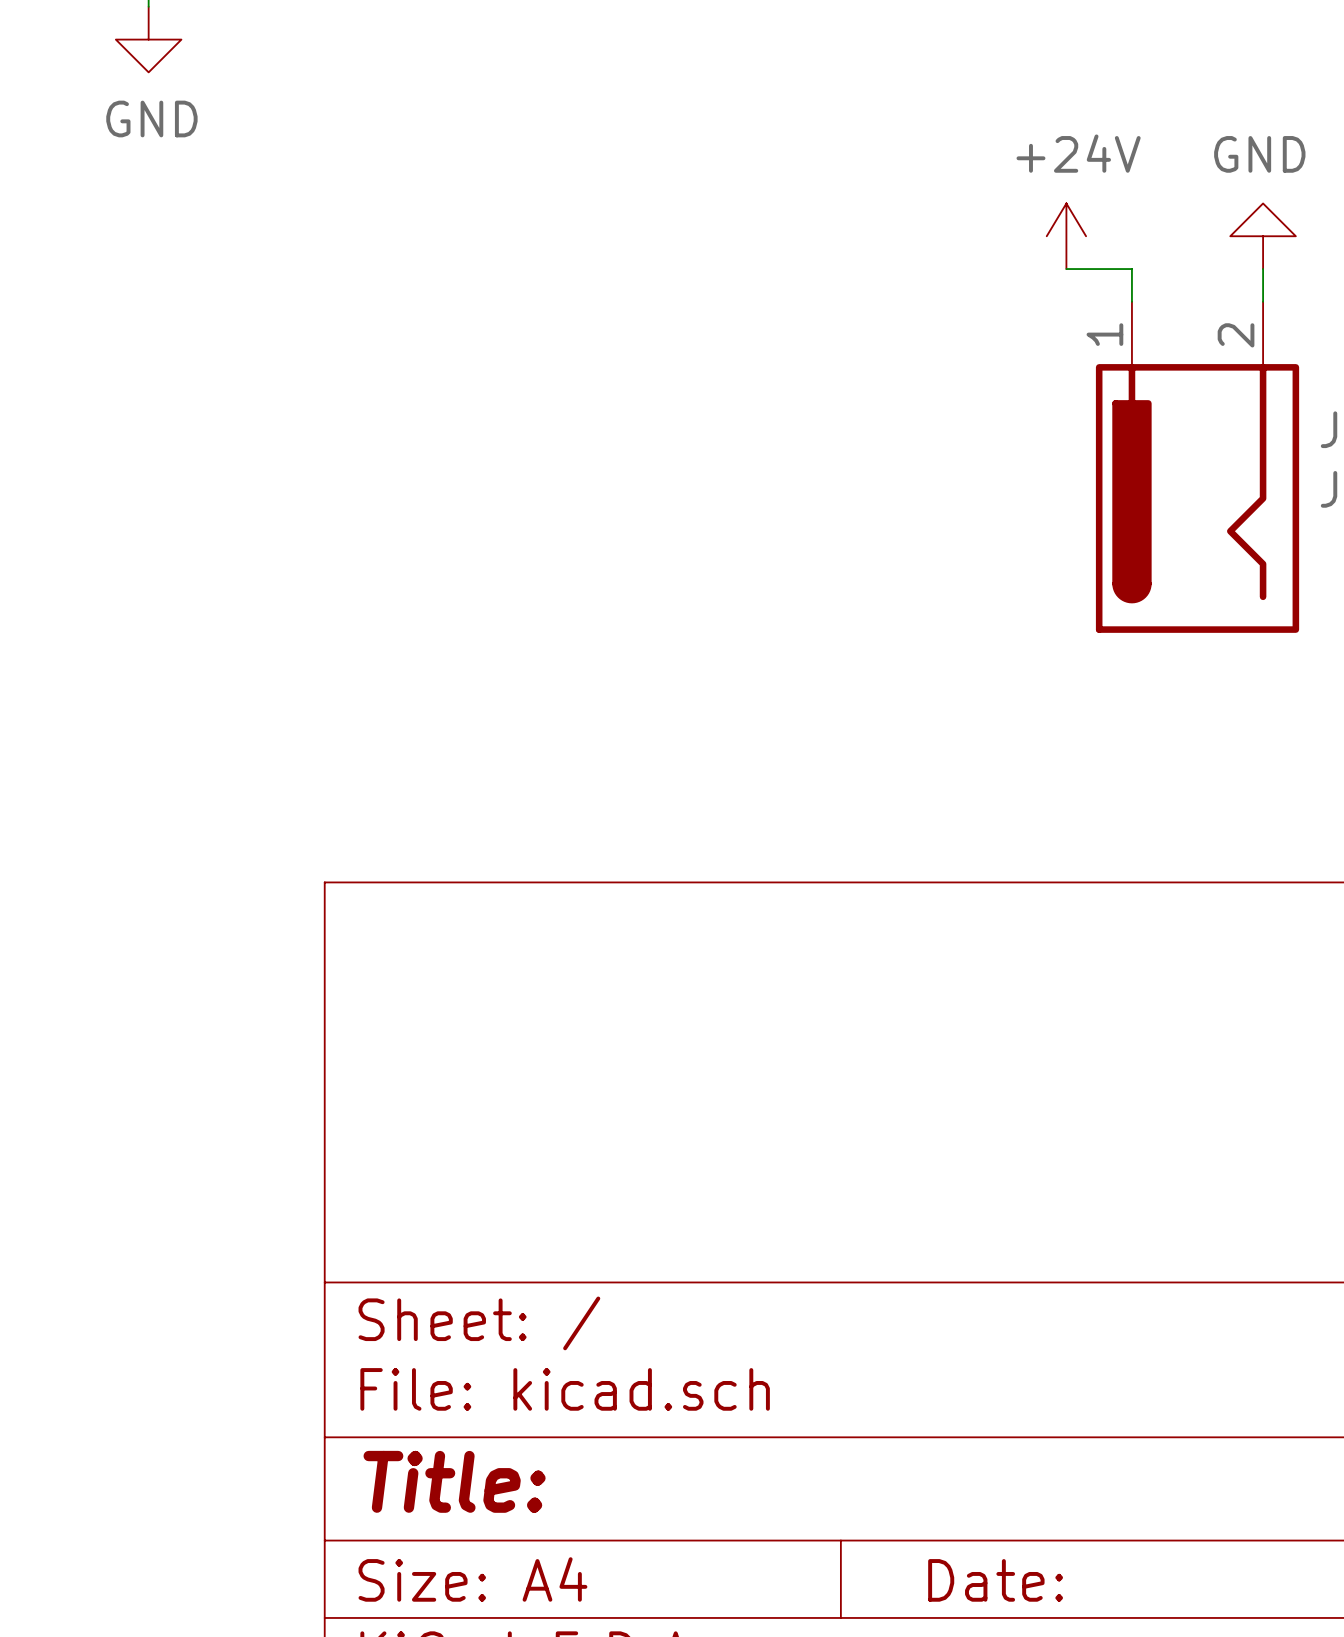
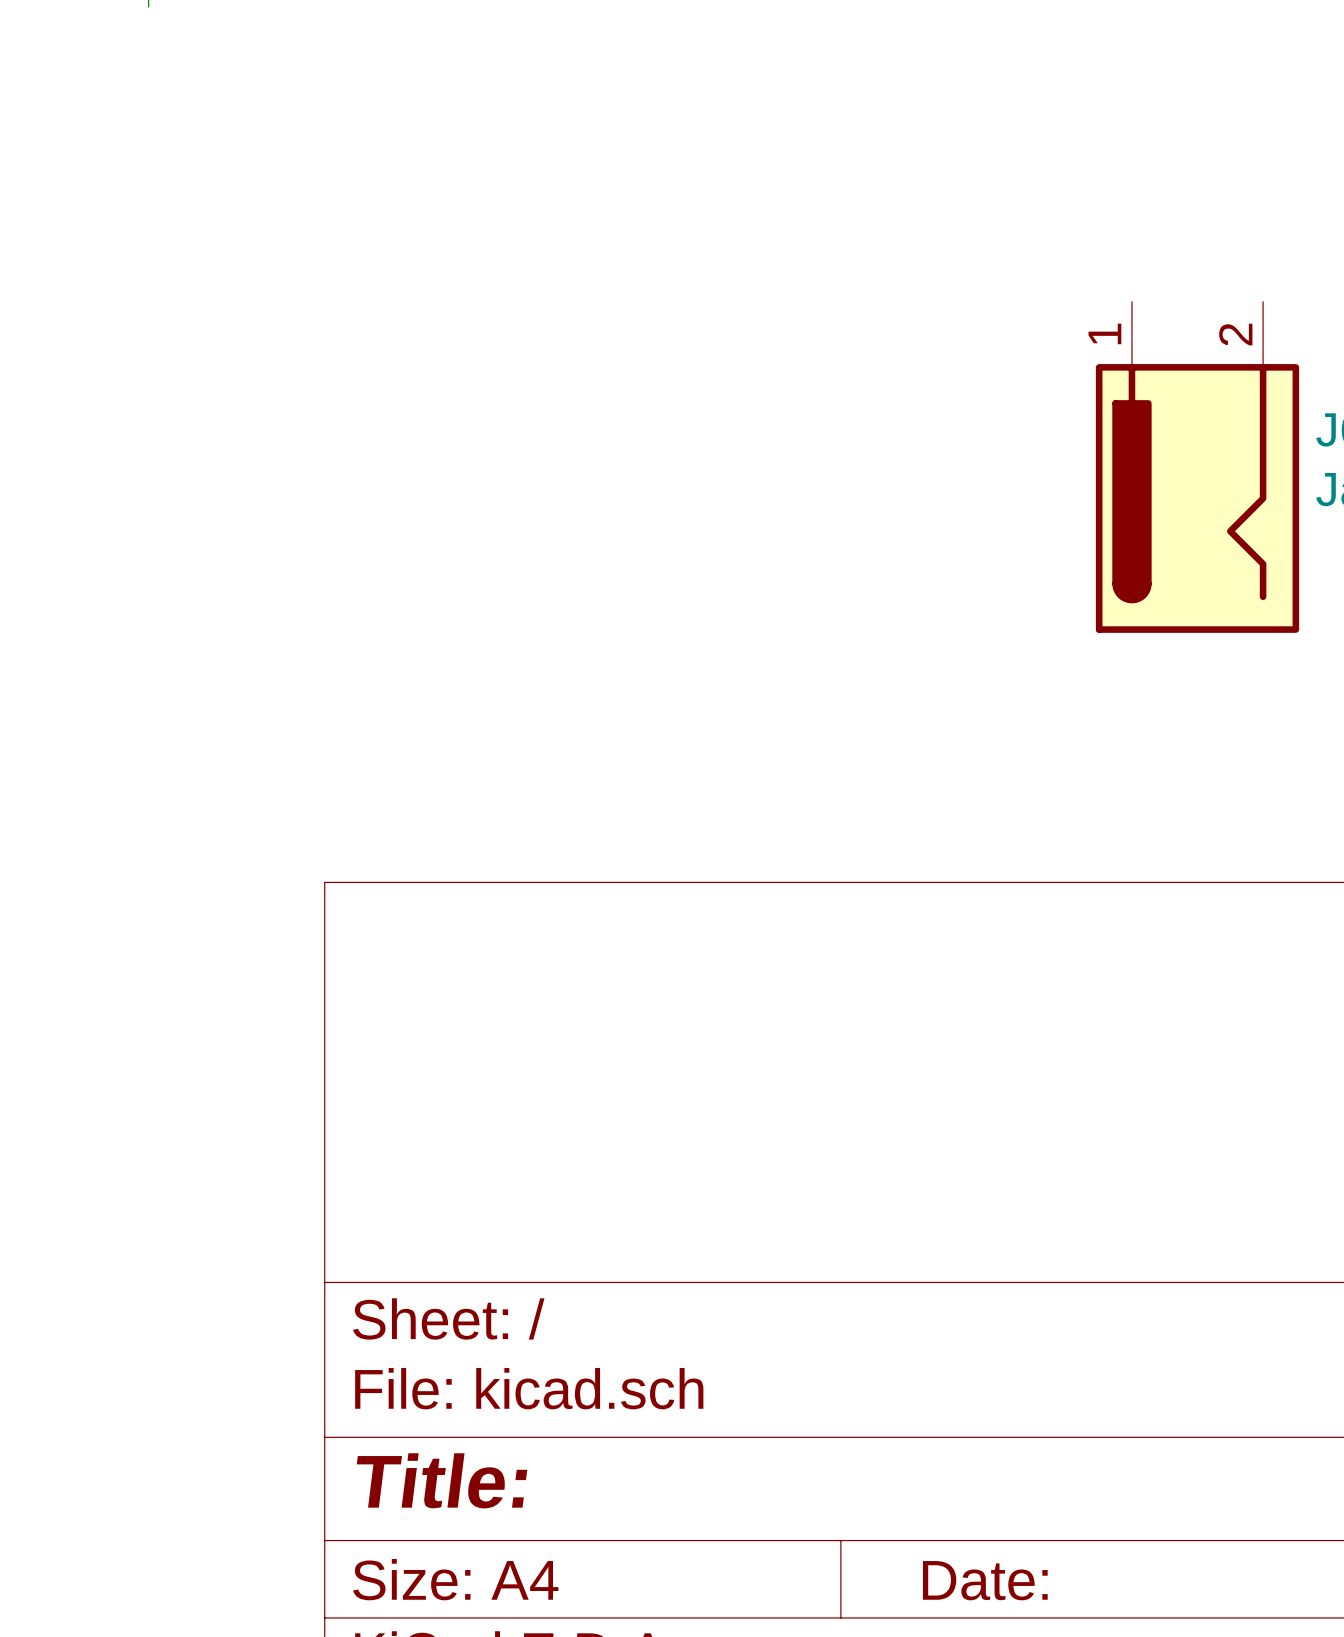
power symbol: GND (148, 39) -> none
power symbol: +24V (1066, 236) -> none
power symbol: GND (1263, 236) -> none
wire: (1066, 269) (1131, 269) (1131, 301) -> none
wire: (1263, 269) (1263, 301) -> none

